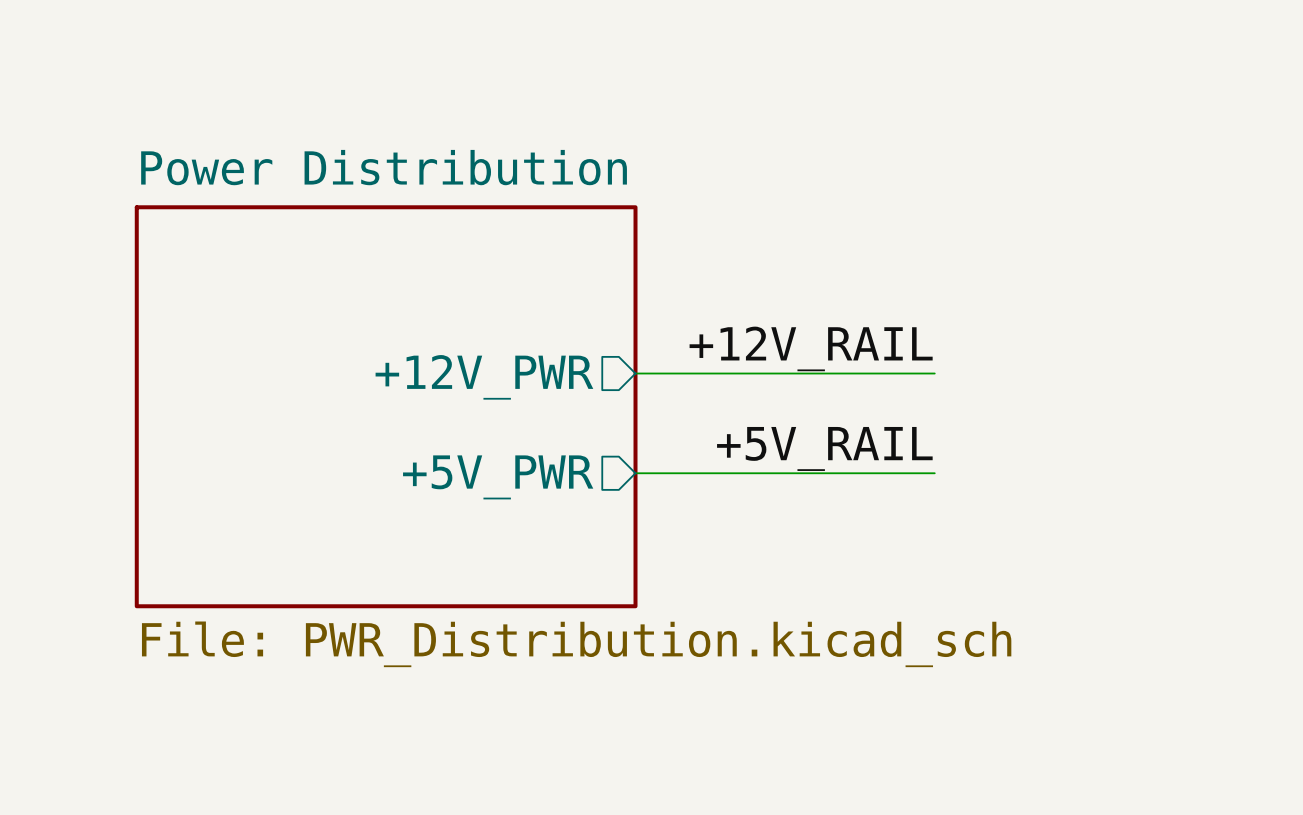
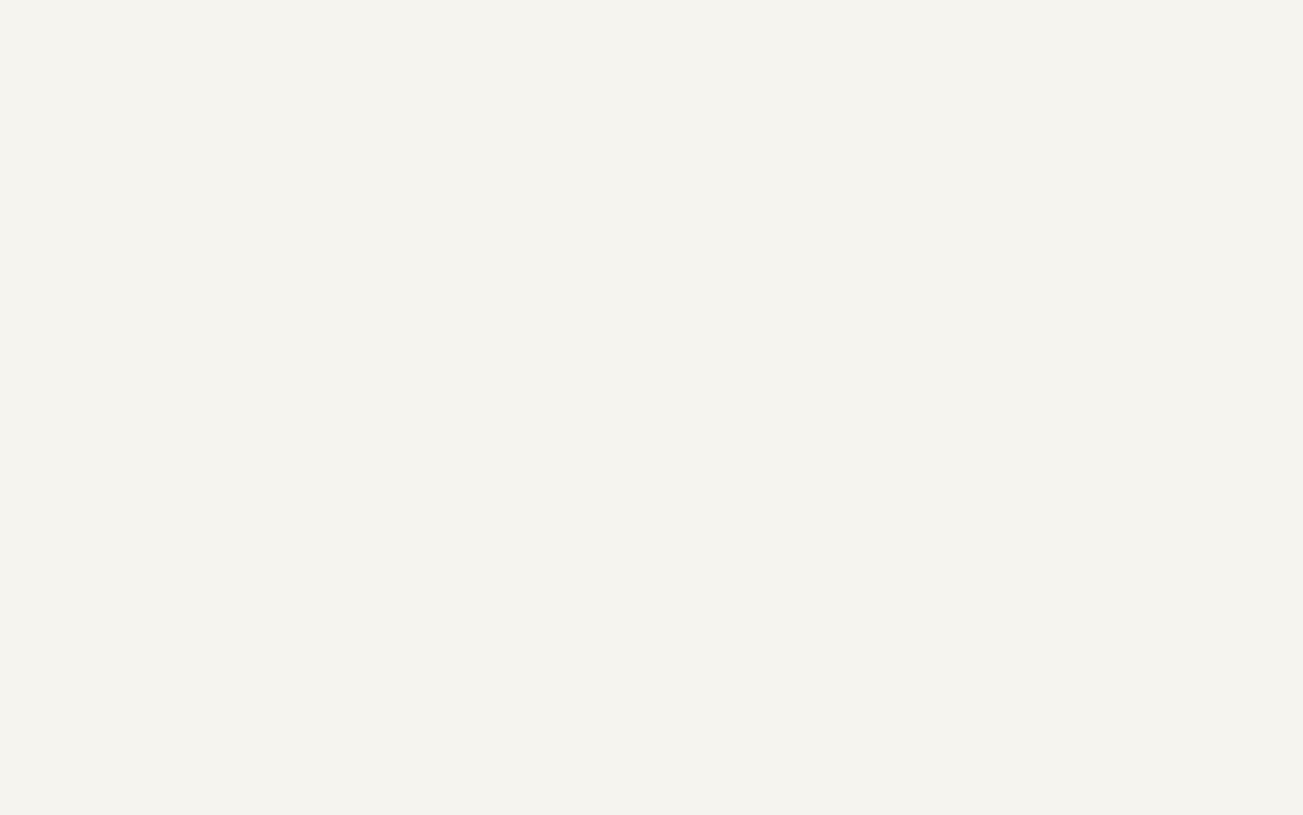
label: +12V_RAIL (811, 348) -> none
wire: (635, 373) (934, 373) -> none
sheet pin: +12V_PWR (484, 377) -> none
sheet Power Distribution: File: PWR_Distribution.kicad_sch (386, 406) -> none
label: +5V_RAIL (824, 448) -> none
wire: (635, 473) (934, 473) -> none
sheet pin: +5V_PWR (498, 477) -> none

